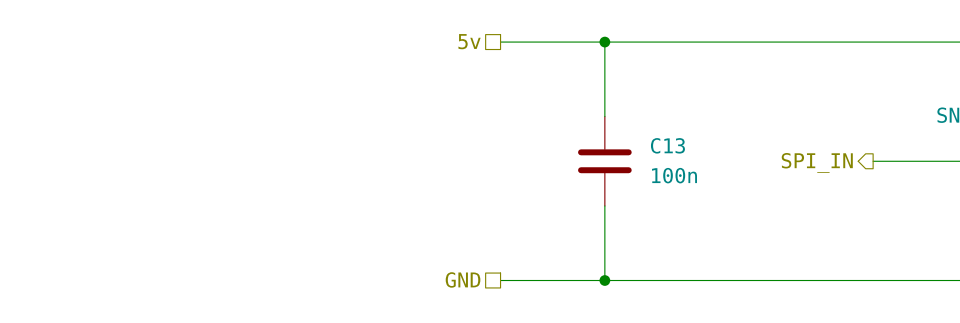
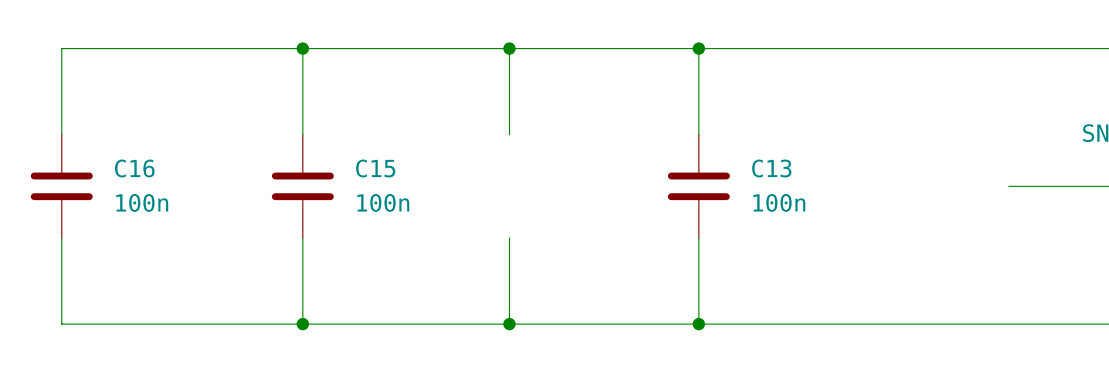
hierarchical label: 5v (469, 41) -> none
wire: none -> (302, 48) (302, 134)
junction: none -> (302, 48)
wire: none -> (509, 48) (509, 134)
junction: none -> (509, 48)
wire: none -> (578, 48) (61, 48) (61, 134)
C16: none -> 100n (61, 186)
C15: none -> 100n (302, 186)
hierarchical label: SPI_IN (817, 163) -> none
wire: none -> (61, 238) (61, 324) (578, 324)
wire: none -> (302, 238) (302, 324)
wire: none -> (509, 238) (509, 324)
hierarchical label: GND (463, 279) -> none
junction: none -> (302, 324)
junction: none -> (509, 324)

